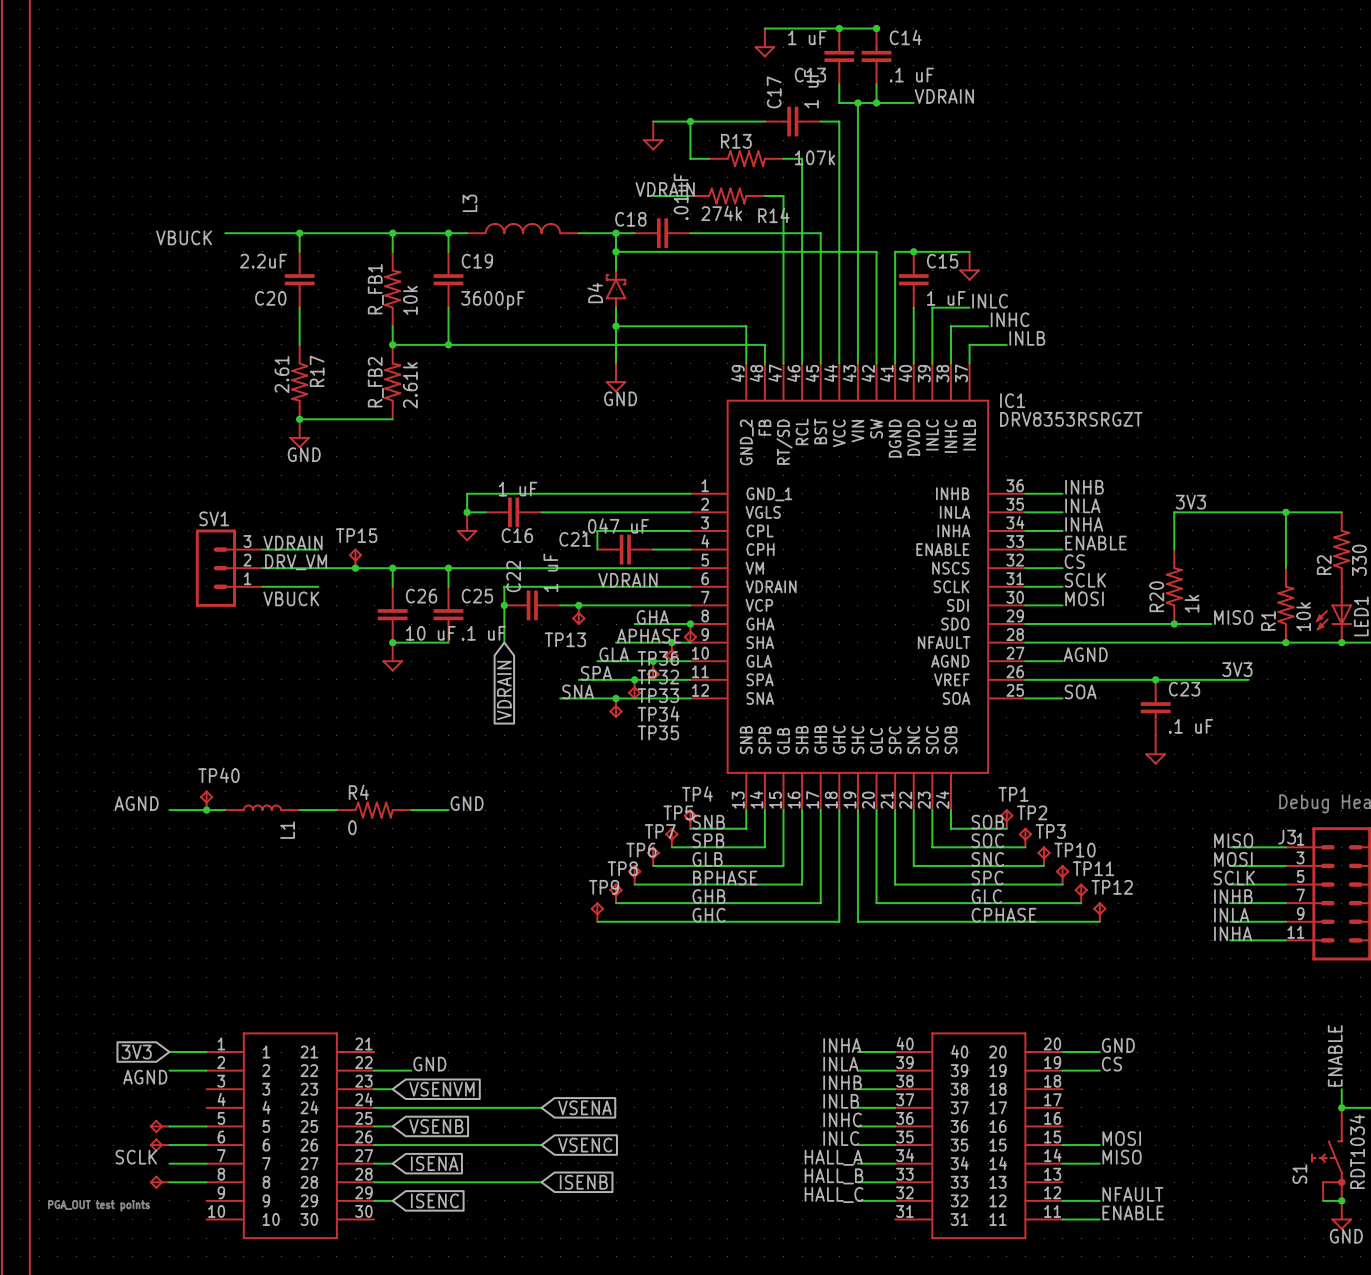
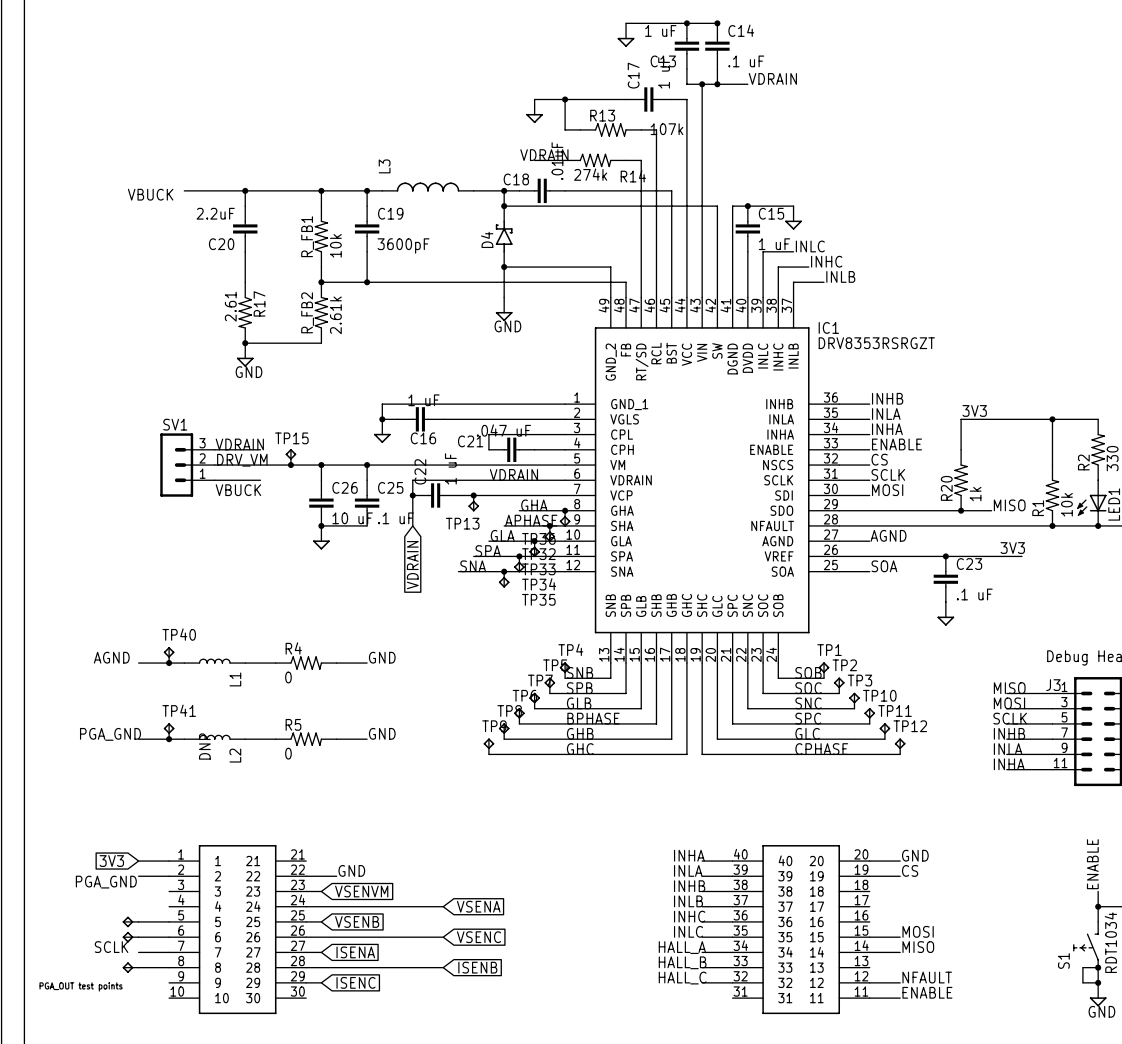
TP41: none -> (169, 731)
label: none -> GND (382, 733)
label: none -> PGA_GND (110, 734)
L2: none -> DNP (214, 737)
wire: none -> (138, 739) (184, 739)
junction: none -> (169, 739)
wire: none -> (245, 739) (275, 739)
R5: none -> 0 (306, 739)
wire: none -> (336, 739) (367, 739)
label: AGND (145, 1077) -> PGA_GND (106, 882)

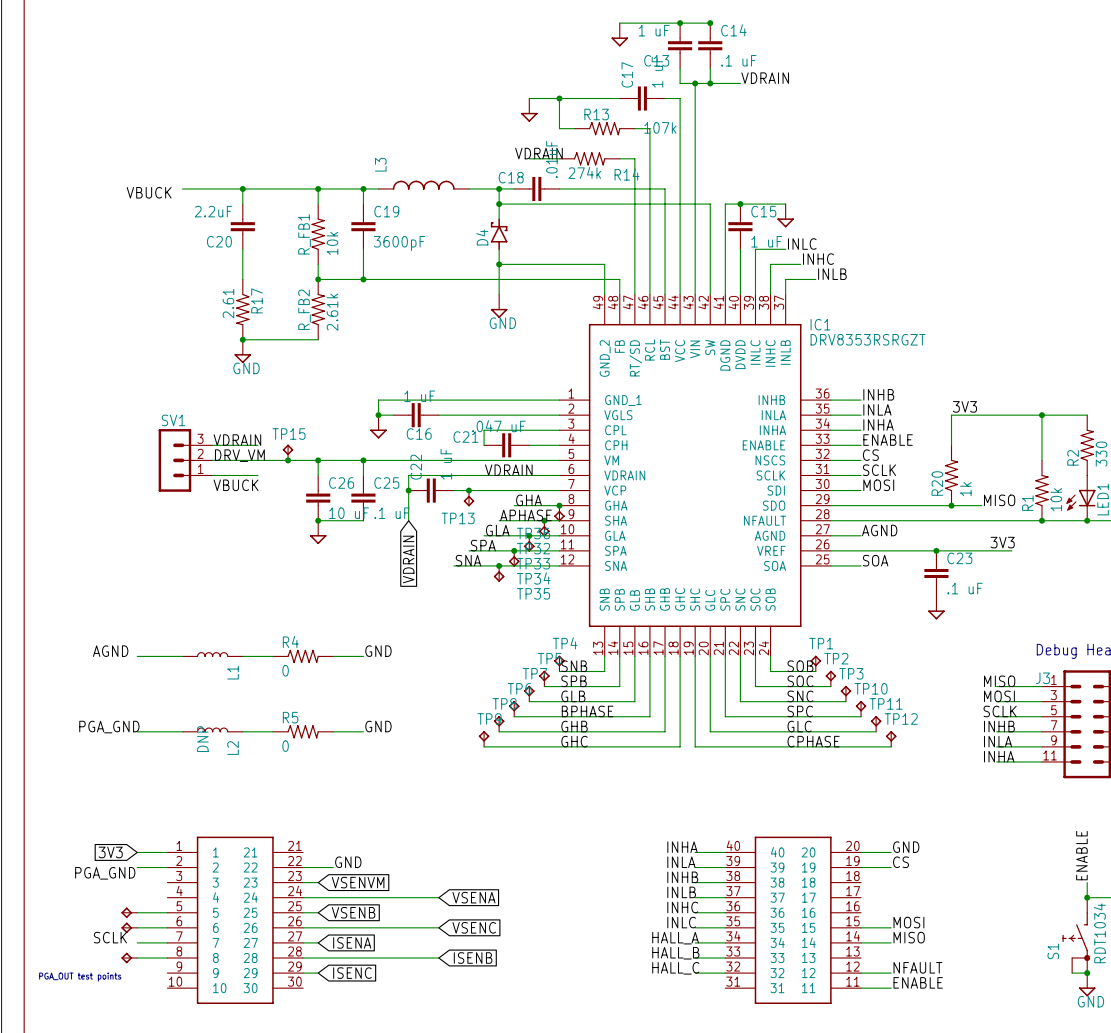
TP40: (169, 655) -> none
junction: (169, 663) -> none
TP41: (169, 731) -> none
junction: (169, 739) -> none

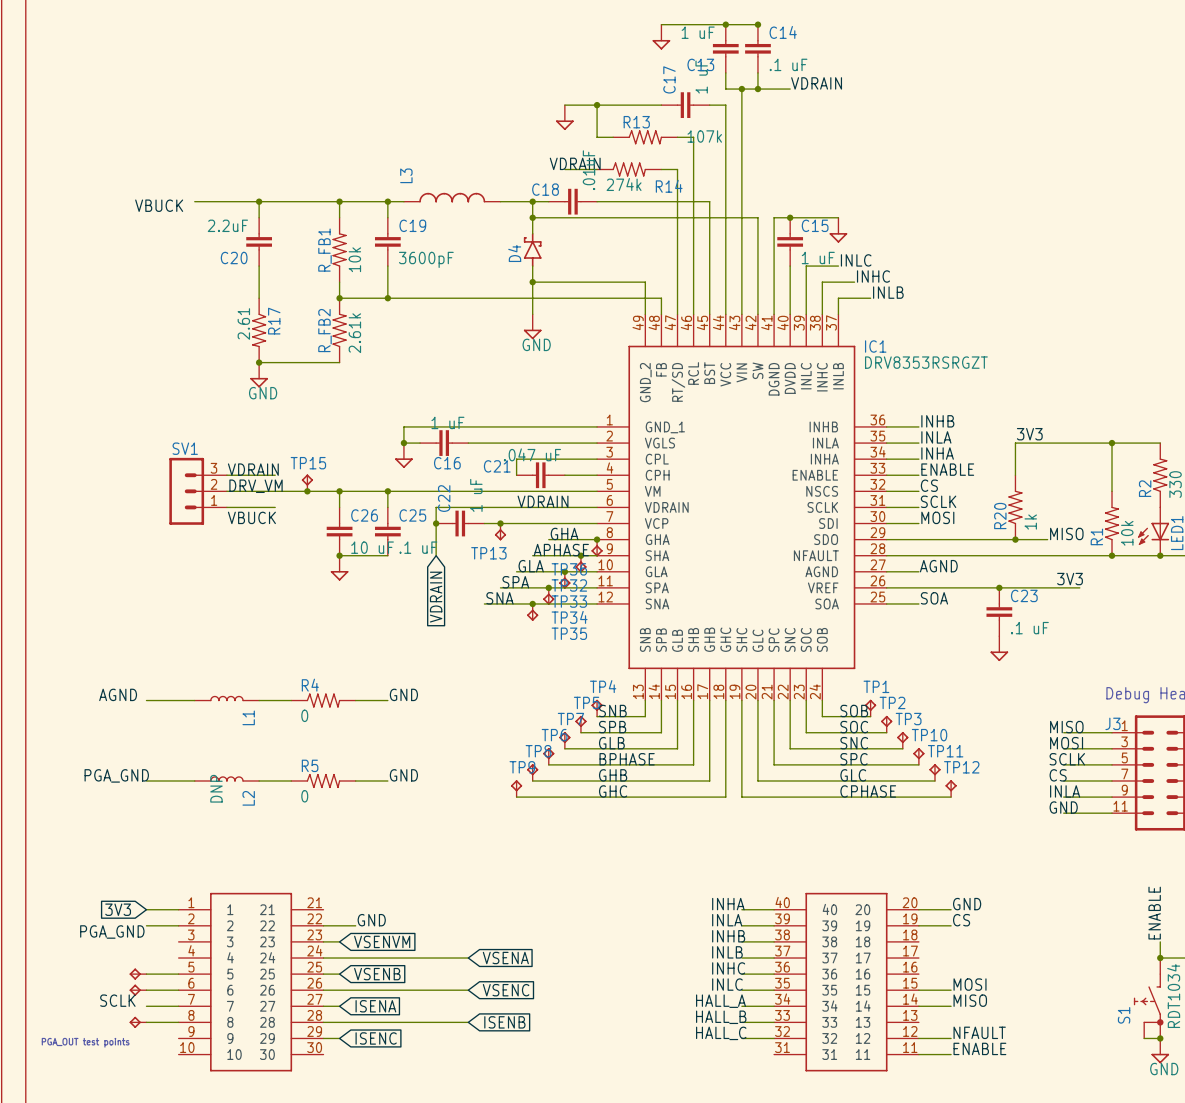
label: INHB (999, 726) -> CS (1058, 775)
label: INHA (999, 756) -> GND (1063, 807)

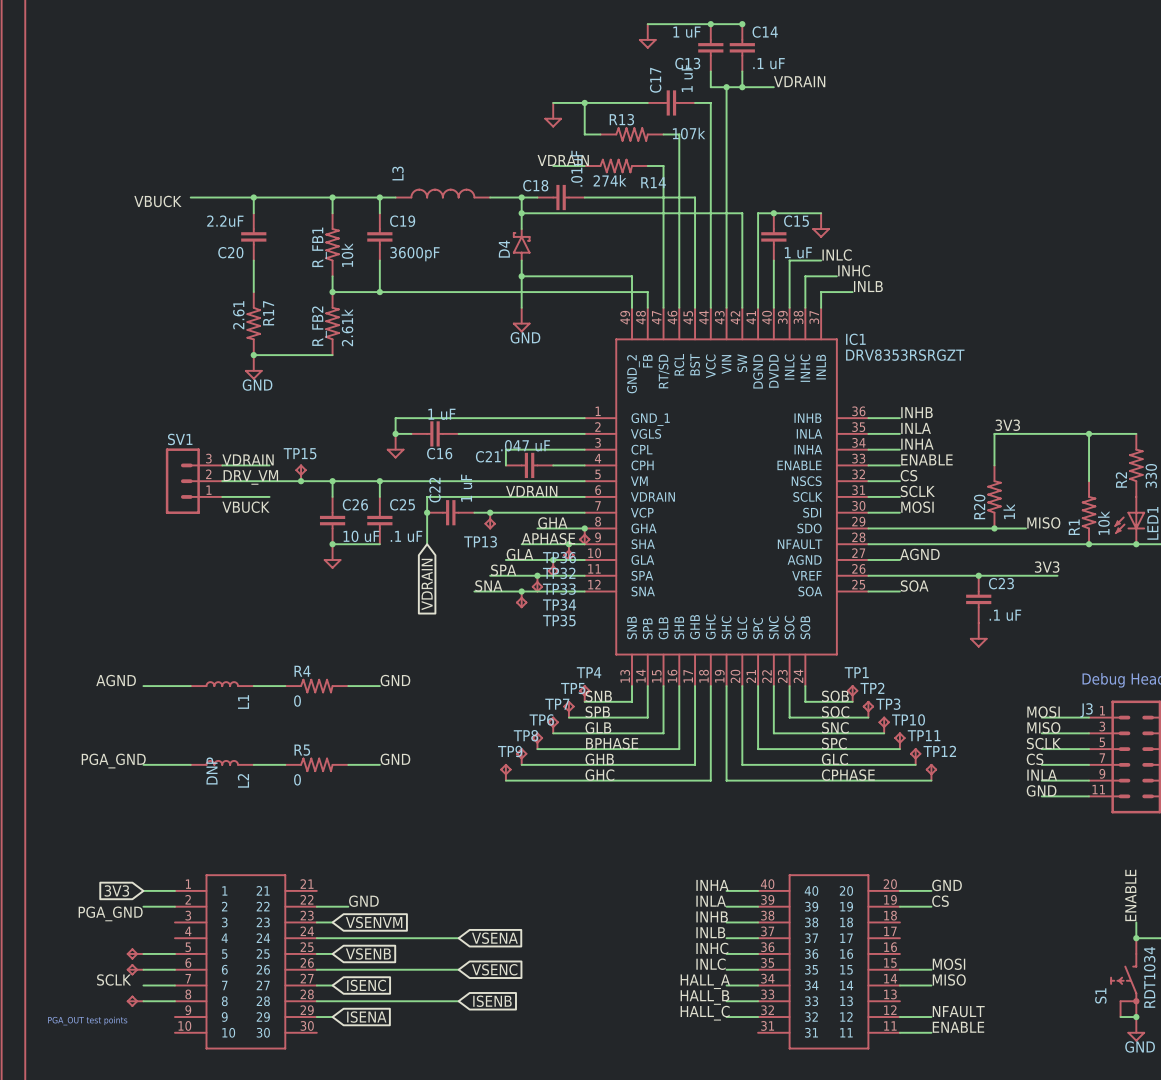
label: MISO (1066, 727) -> MOSI (1043, 712)
label: MOSI (1066, 743) -> MISO (1043, 727)
global label: ISENA (375, 1006) -> ISENC (366, 985)
global label: ISENC (376, 1038) -> ISENA (366, 1017)

